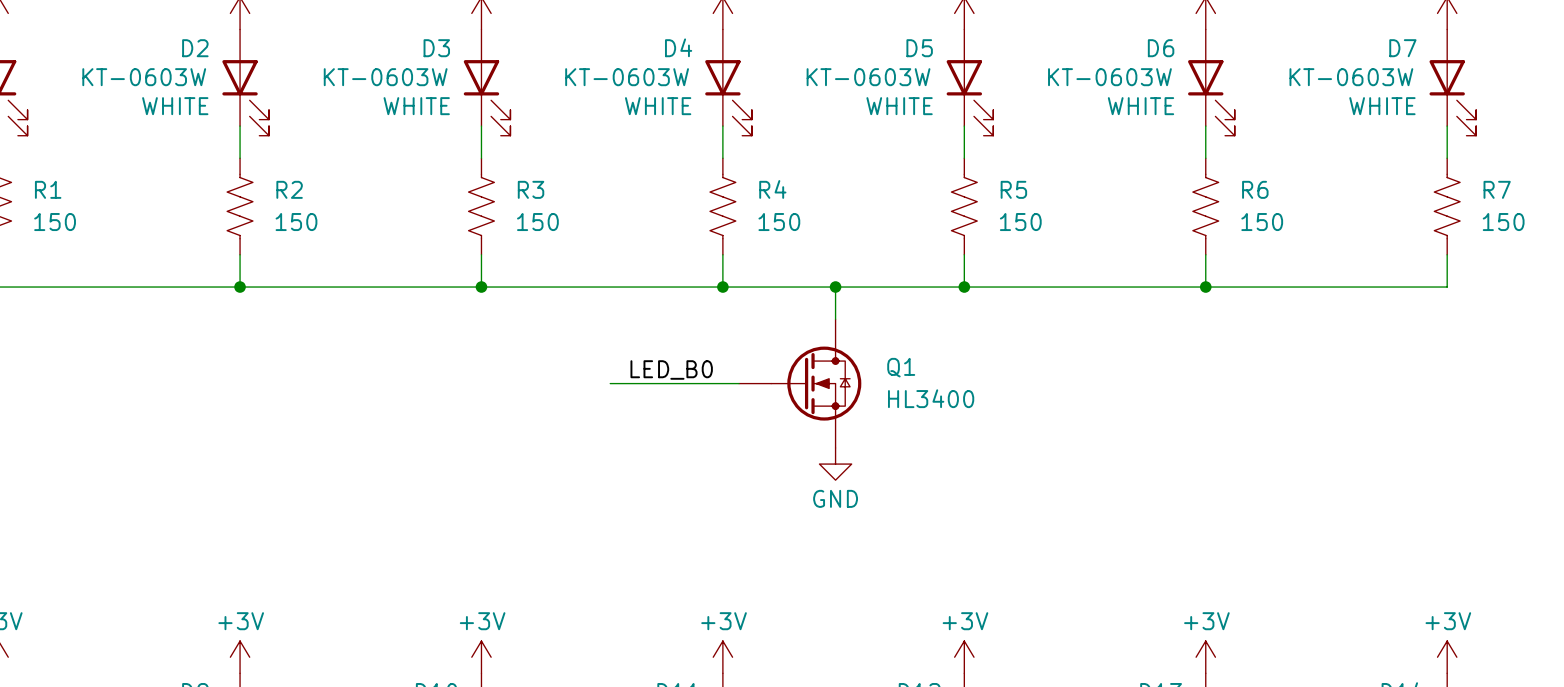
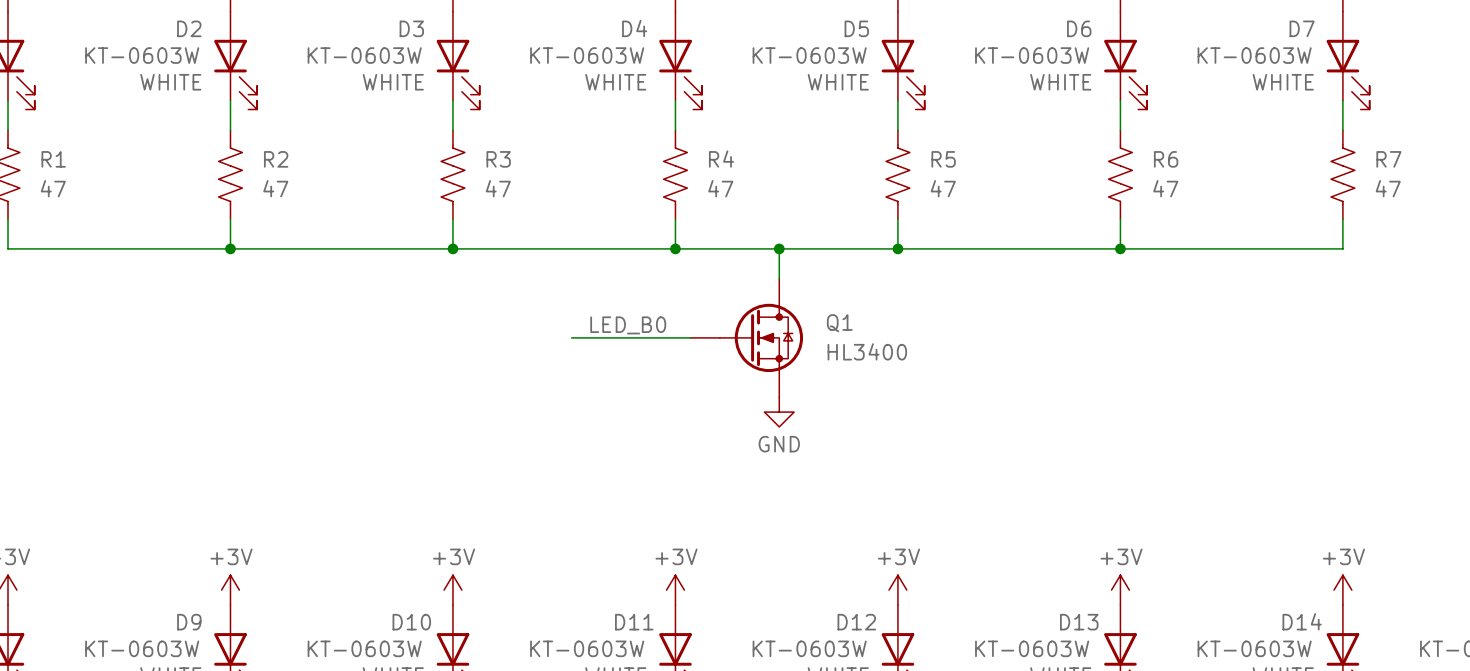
R1 value: 150 (55, 222) -> 47 (53, 188)
R2 value: 150 (296, 222) -> 47 (275, 188)
R3 value: 150 (537, 222) -> 47 (498, 188)
R4 value: 150 (779, 222) -> 47 (720, 188)
R5 value: 150 (1020, 222) -> 47 (943, 188)
R6 value: 150 (1262, 222) -> 47 (1165, 188)
R7 value: 150 (1503, 222) -> 47 (1388, 188)

